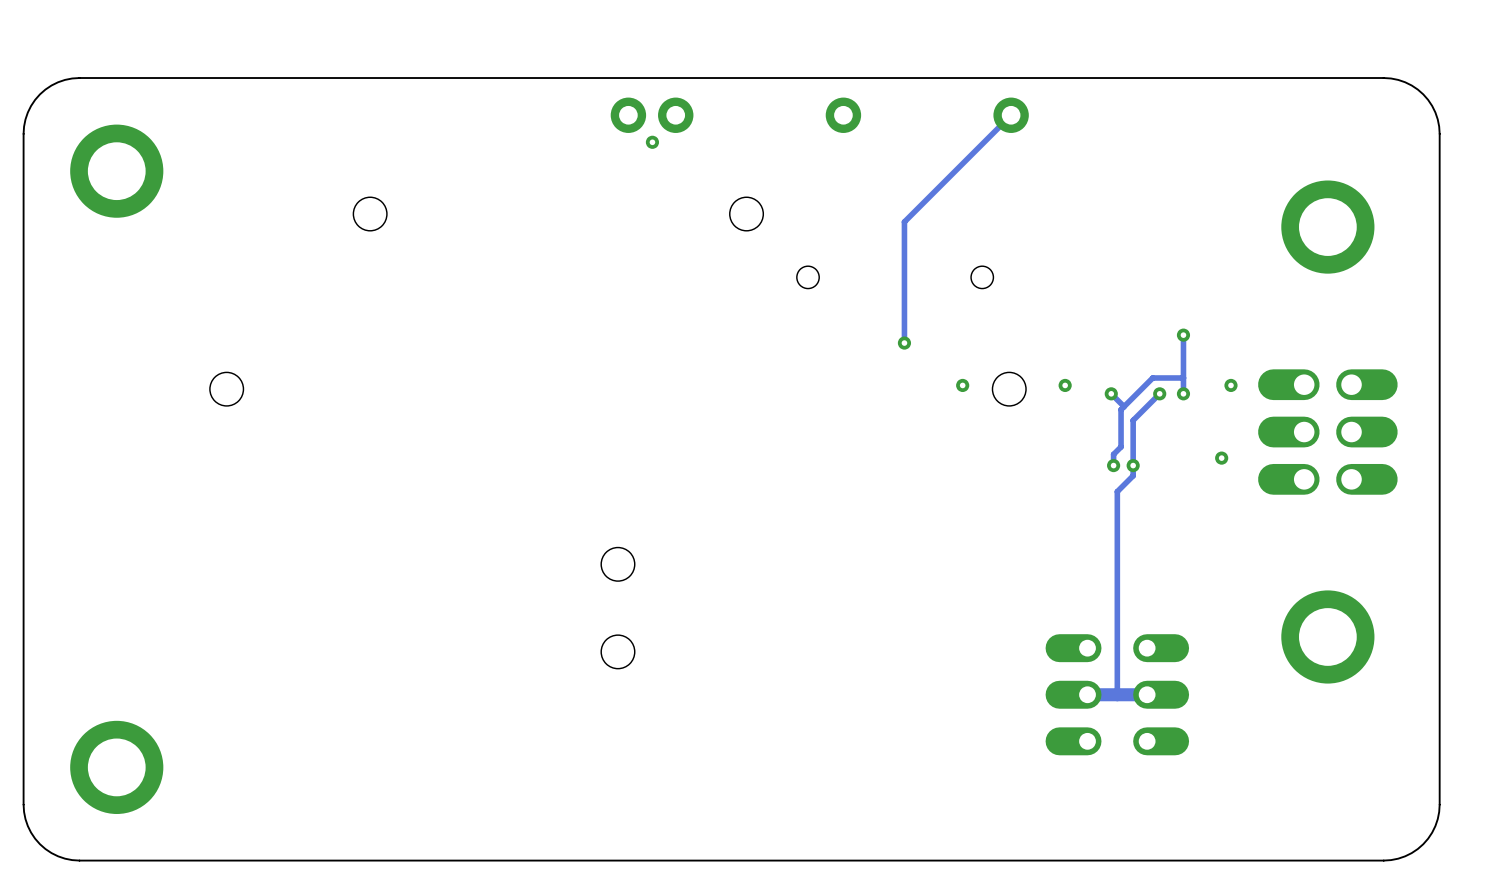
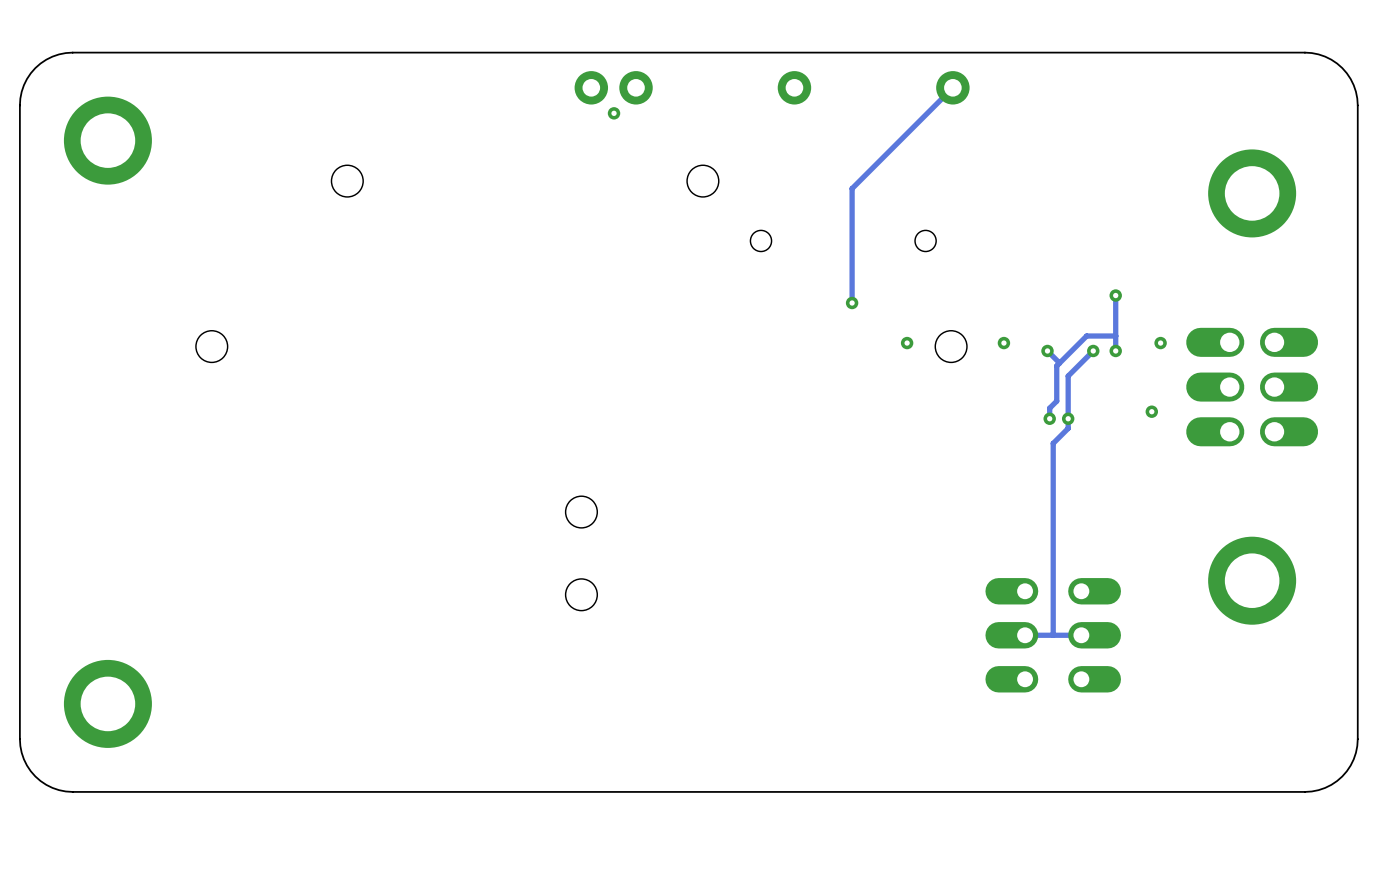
track width: thick (1147, 694) (1087, 694) -> thin (1081, 635) (1025, 635)

